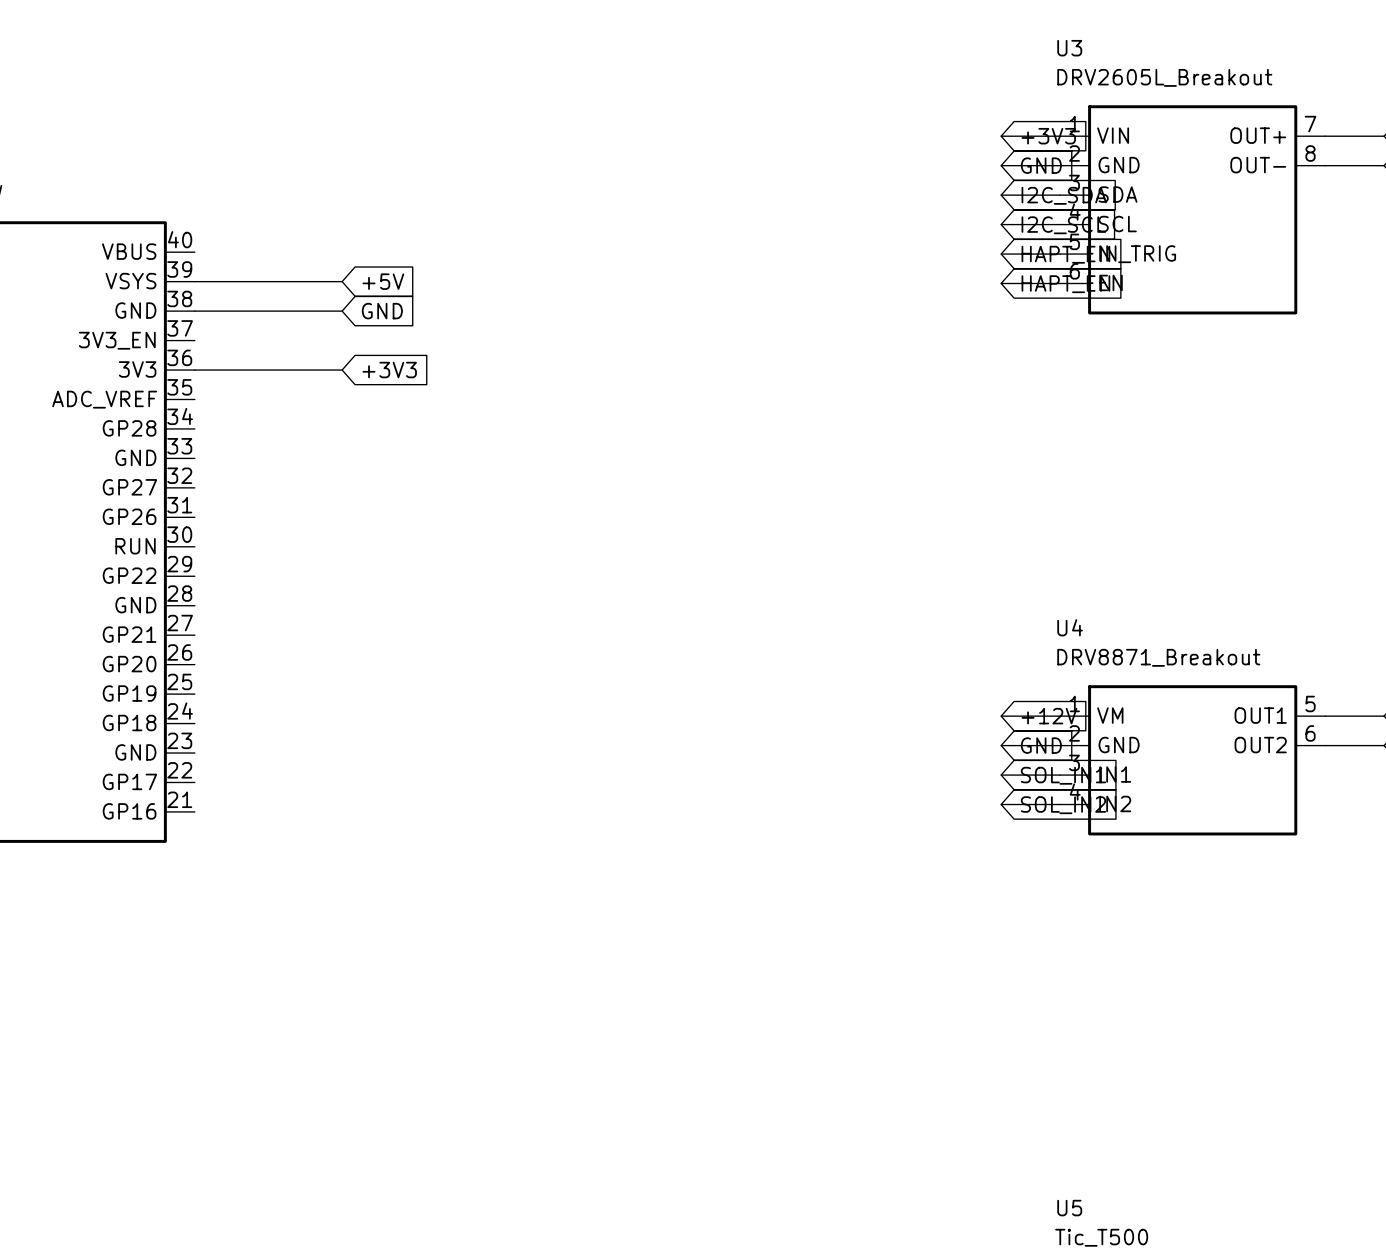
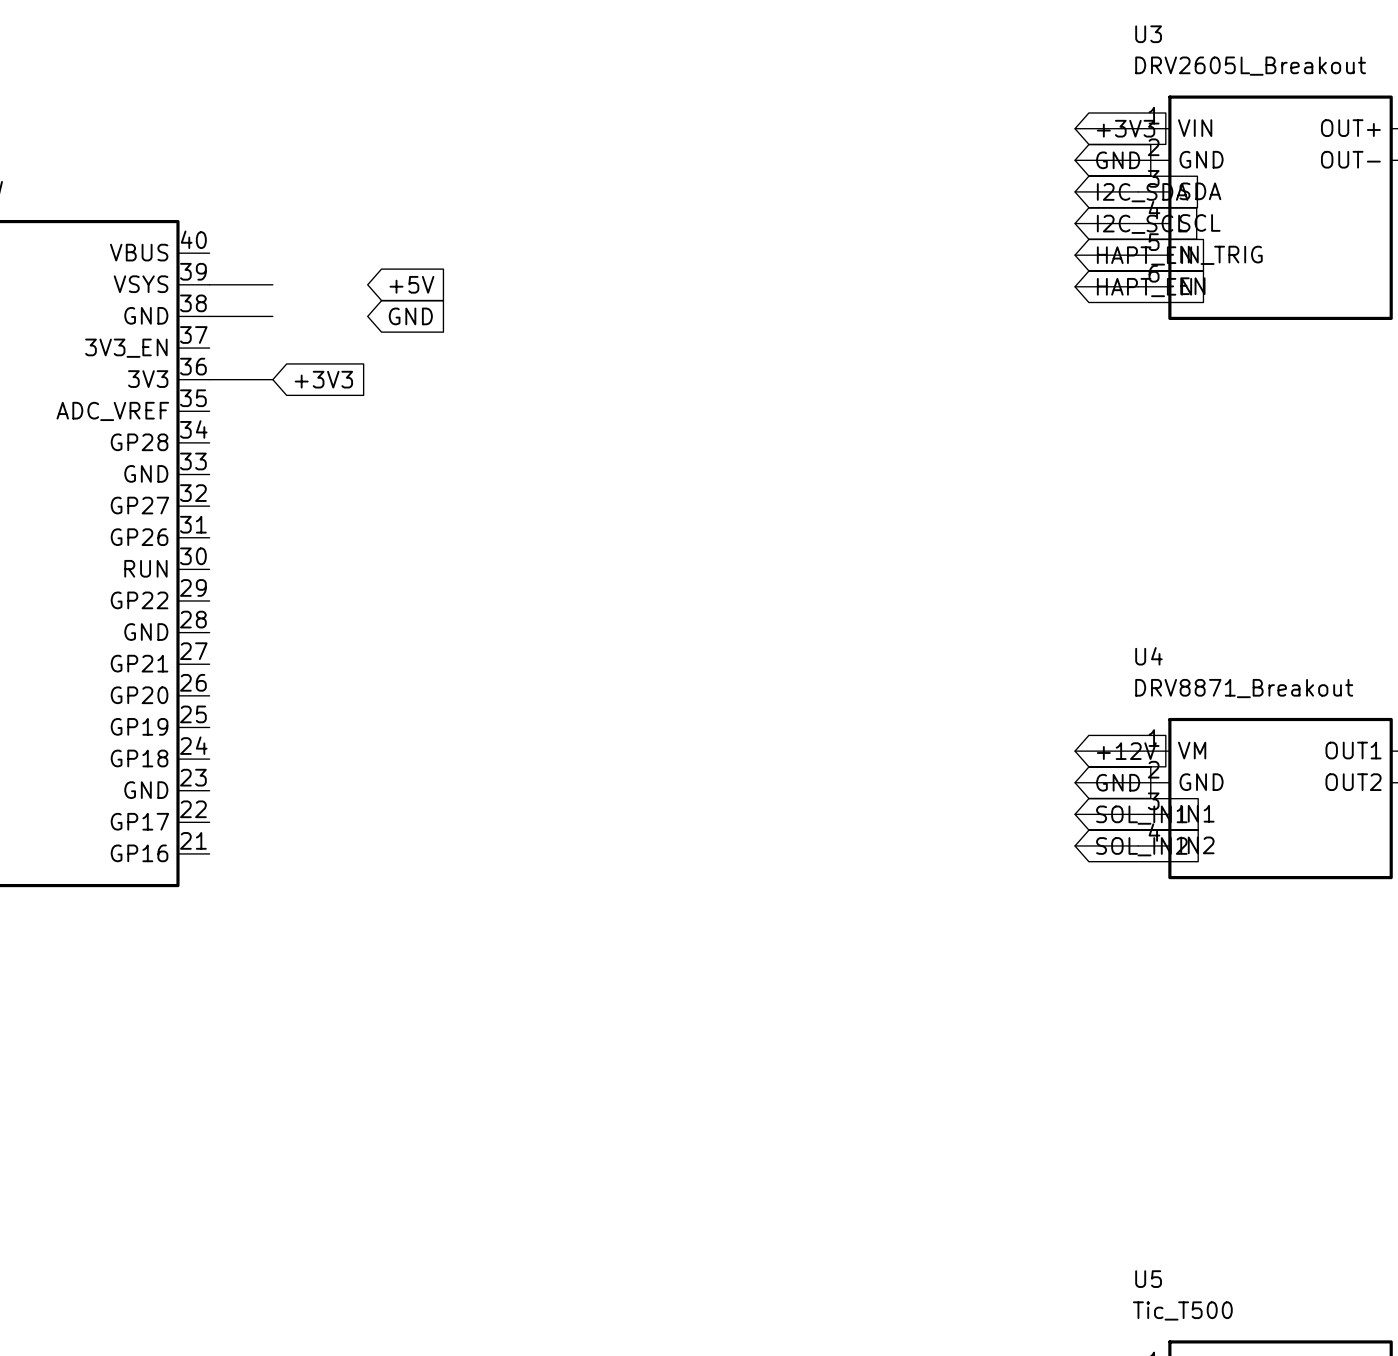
wire: (253, 281) (342, 281) -> none
wire: (253, 311) (342, 311) -> none
wire: (253, 370) (342, 370) -> none
global label position: +3V3 (389, 370) -> +3V3 (323, 379)

